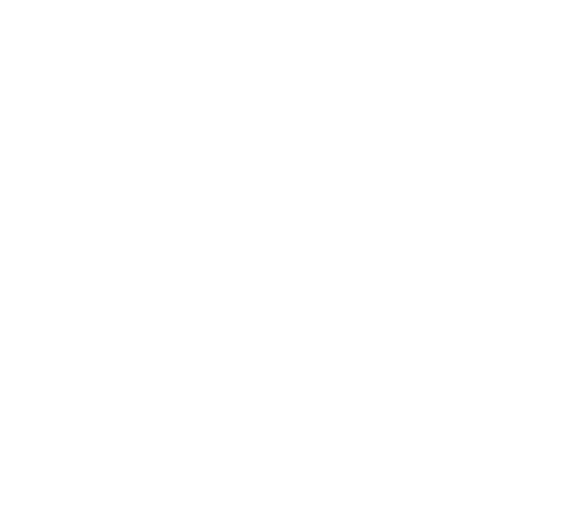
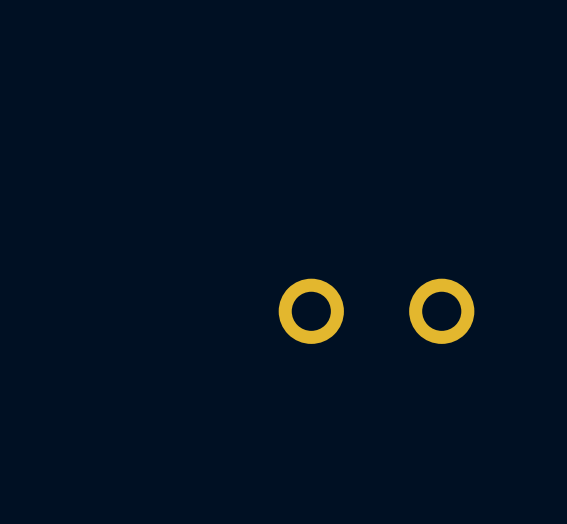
part: none -> (376, 311)

